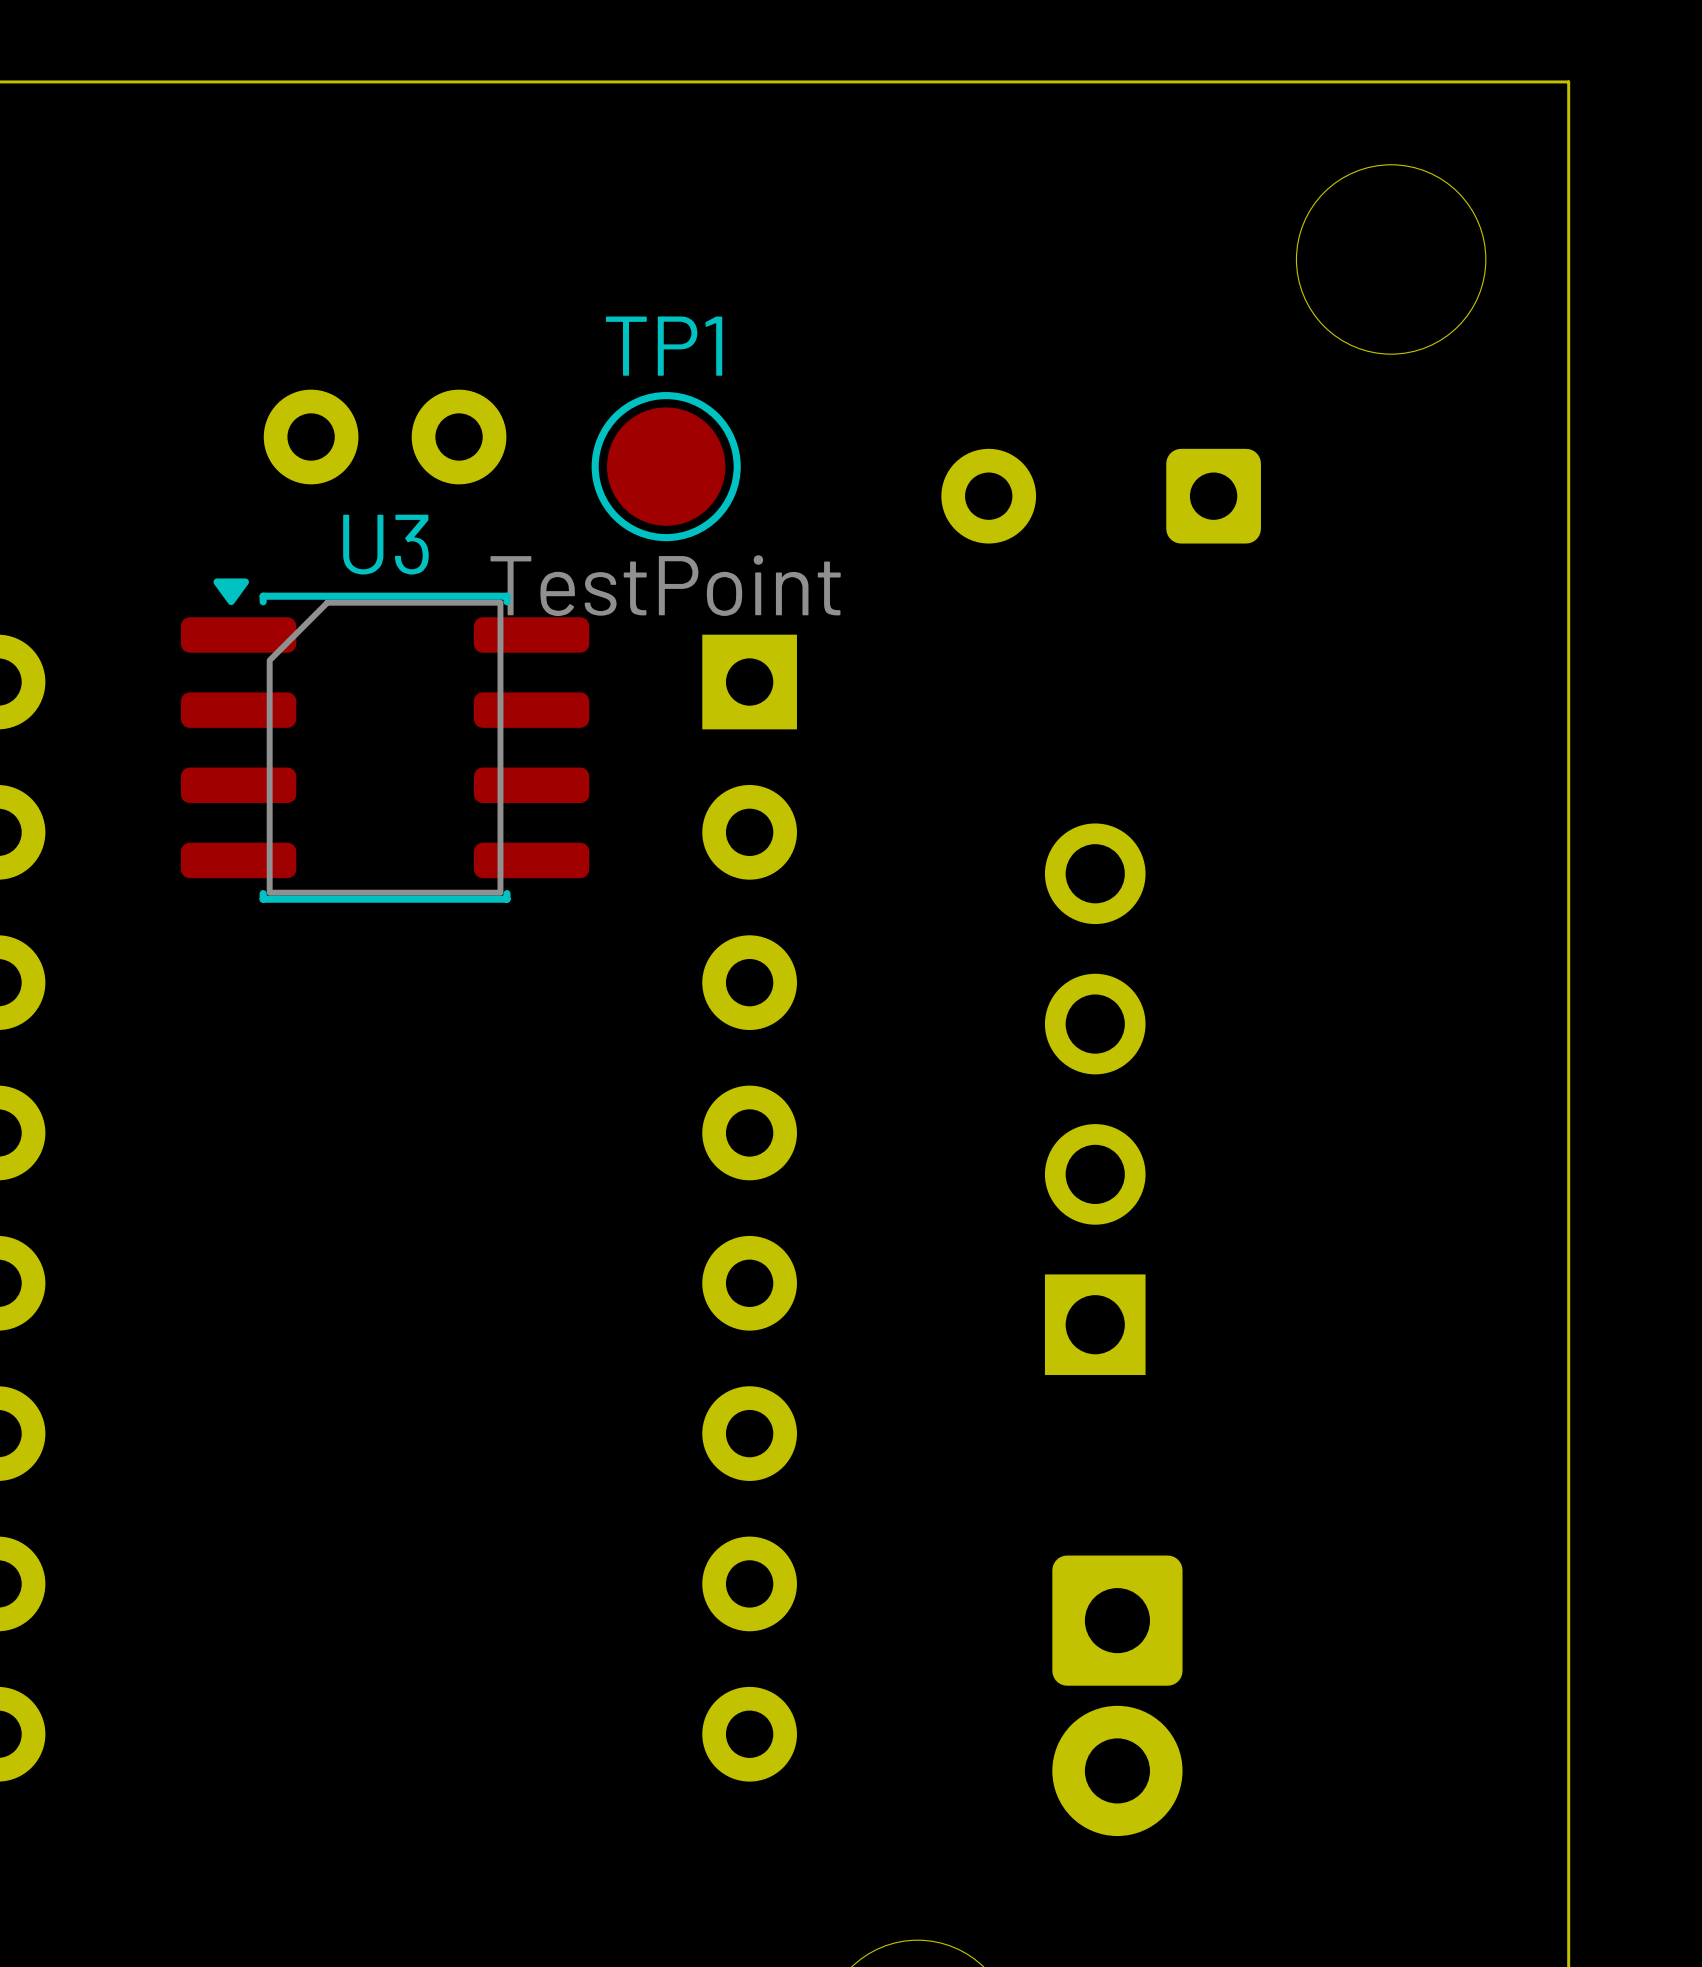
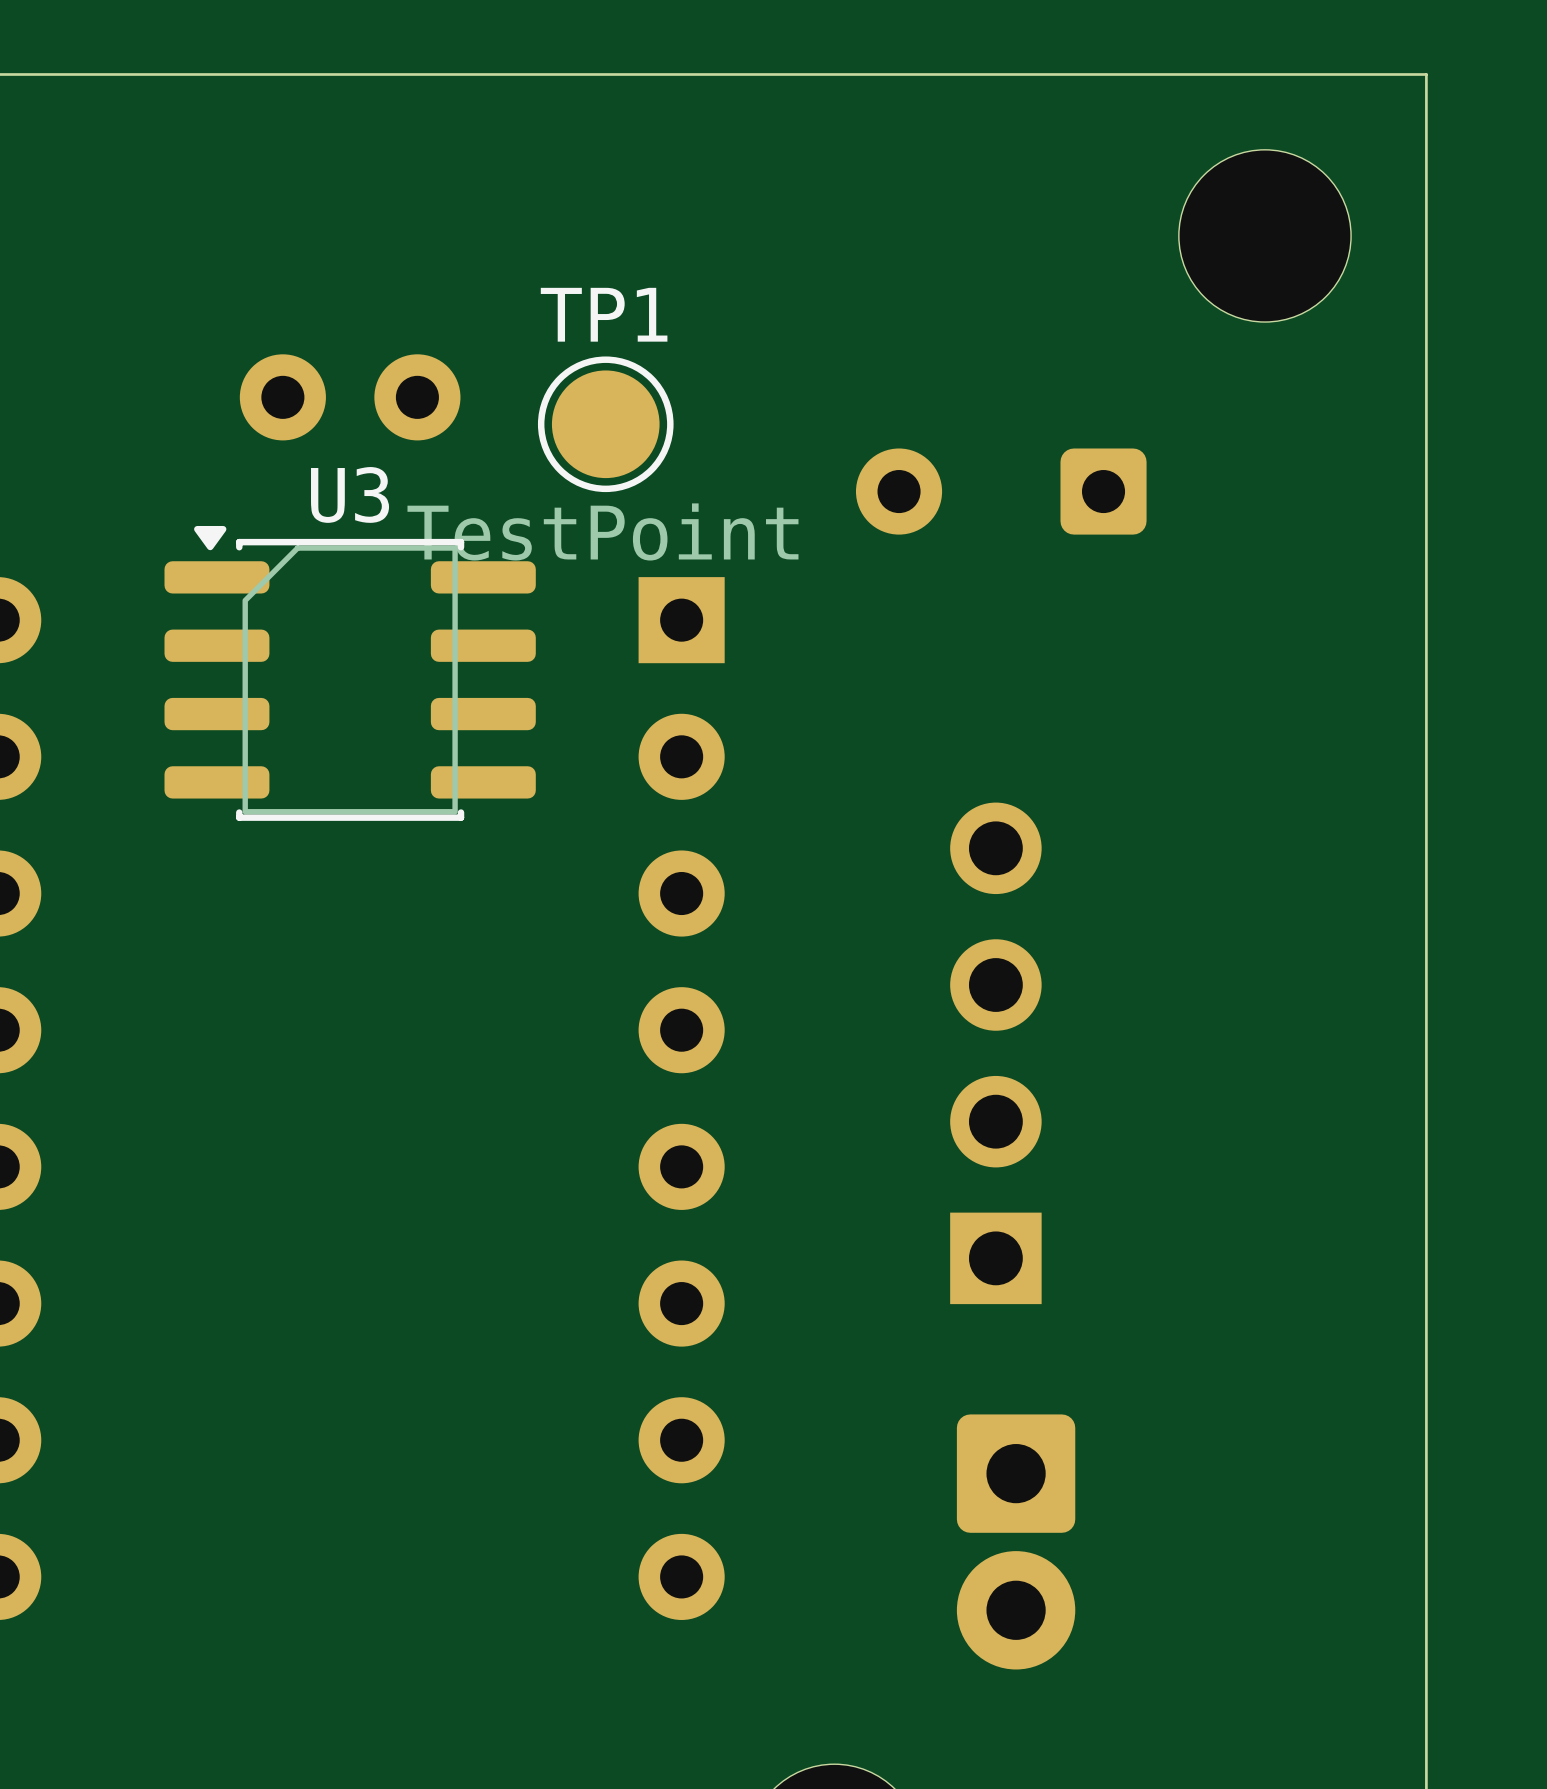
part position: (1101, 496) -> (1001, 491)
part position: (1095, 1099) -> (995, 1053)

